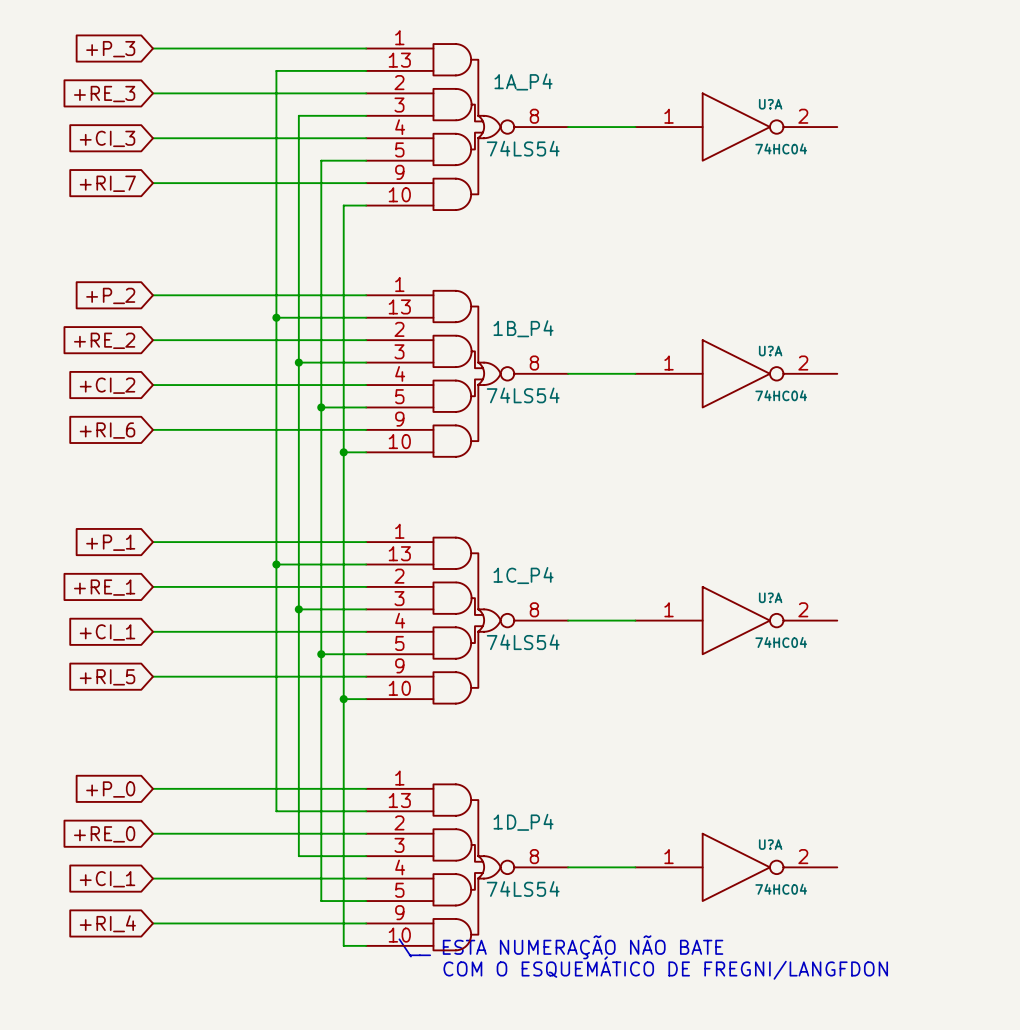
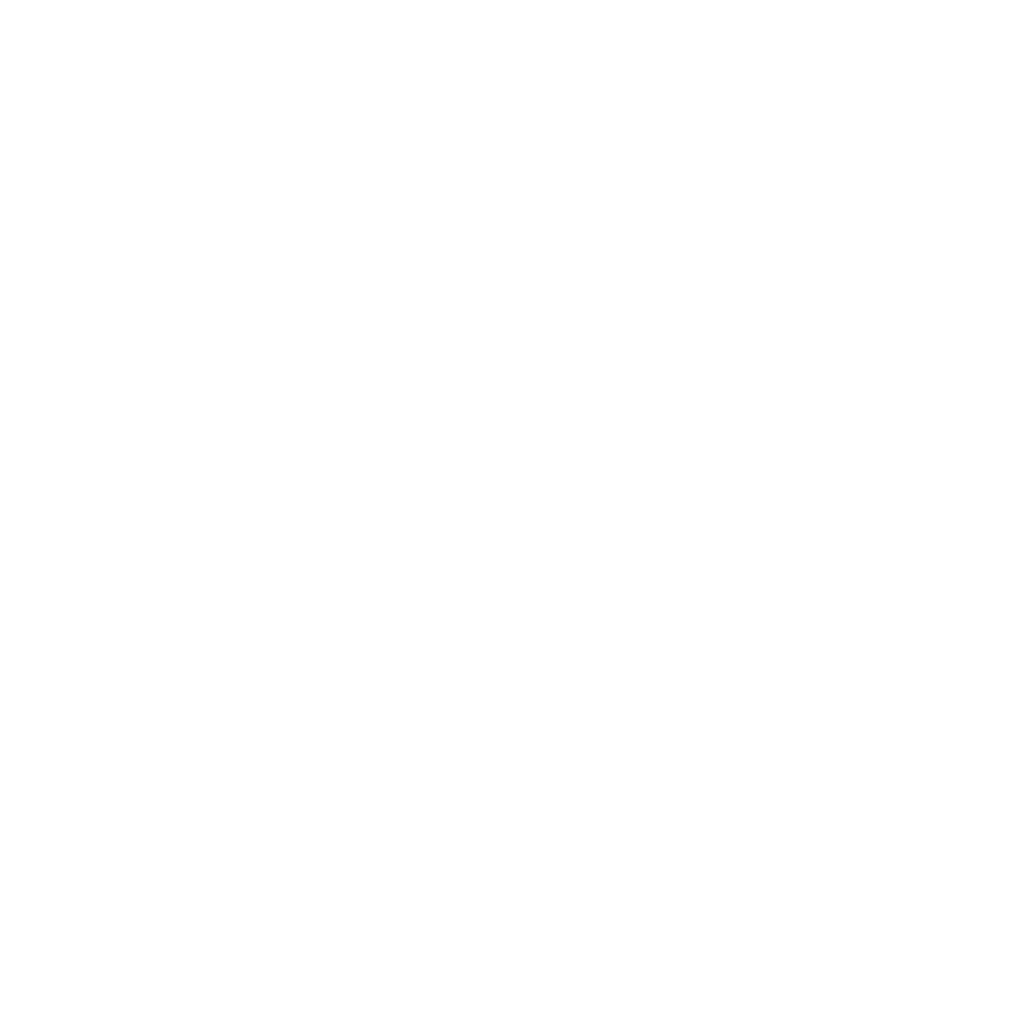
wire: (153, 48) (366, 48) -> none
global label: +P_3 (110, 49) -> none
wire: (366, 70) (276, 70) (276, 811) (366, 811) -> none
wire: (153, 93) (366, 93) -> none
global label: +RE_3 (104, 94) -> none
wire: (366, 115) (298, 115) (298, 856) (366, 856) -> none
1A_P4: 74LS54 (467, 127) -> none
wire: (568, 127) (635, 127) -> none
U?A: 74HC04 (736, 127) -> none
global label: +CI_3 (107, 138) -> none
wire: (153, 138) (366, 138) -> none
wire: (366, 160) (321, 160) (321, 901) (366, 901) -> none
global label: +RI_7 (107, 183) -> none
wire: (153, 183) (366, 183) -> none
wire: (366, 205) (343, 205) (343, 945) (366, 945) -> none
global label: +P_2 (110, 295) -> none
wire: (153, 295) (366, 295) -> none
wire: (276, 317) (366, 317) -> none
junction: (276, 317) -> none
global label: +RE_2 (104, 340) -> none
wire: (153, 340) (366, 340) -> none
wire: (298, 362) (366, 362) -> none
junction: (298, 362) -> none
1B_P4: 74LS54 (467, 373) -> none
wire: (568, 373) (635, 373) -> none
U?A: 74HC04 (736, 373) -> none
global label: +CI_2 (107, 385) -> none
wire: (153, 385) (366, 385) -> none
wire: (321, 407) (366, 407) -> none
junction: (321, 407) -> none
wire: (153, 429) (366, 429) -> none
global label: +RI_6 (107, 430) -> none
wire: (343, 452) (366, 452) -> none
junction: (343, 452) -> none
global label: +P_1 (110, 542) -> none
wire: (153, 542) (366, 542) -> none
wire: (276, 564) (366, 564) -> none
junction: (276, 564) -> none
wire: (153, 586) (366, 586) -> none
global label: +RE_1 (104, 587) -> none
wire: (298, 609) (366, 609) -> none
junction: (298, 609) -> none
1C_P4: 74LS54 (467, 620) -> none
wire: (568, 620) (635, 620) -> none
U?A: 74HC04 (736, 620) -> none
wire: (153, 631) (366, 631) -> none
global label: +CI_1 (107, 632) -> none
wire: (321, 654) (366, 654) -> none
junction: (321, 654) -> none
wire: (153, 676) (366, 676) -> none
global label: +RI_5 (107, 677) -> none
wire: (343, 699) (366, 699) -> none
junction: (343, 699) -> none
wire: (153, 788) (366, 788) -> none
global label: +P_0 (110, 789) -> none
wire: (153, 833) (366, 833) -> none
global label: +RE_0 (104, 834) -> none
1D_P4: 74LS54 (467, 867) -> none
wire: (568, 867) (635, 867) -> none
U?A: 74HC04 (736, 867) -> none
wire: (153, 878) (366, 878) -> none
global label: +CI_1 (107, 879) -> none
global label: +RI_4 (107, 923) -> none
wire: (153, 923) (366, 923) -> none
text: \__ ESTA NUMERAÇÃO NÃO BATE (560, 947) -> none
text: COM O ESQUEMÁTICO DE FREGNI/LANGFDON (665, 968) -> none

